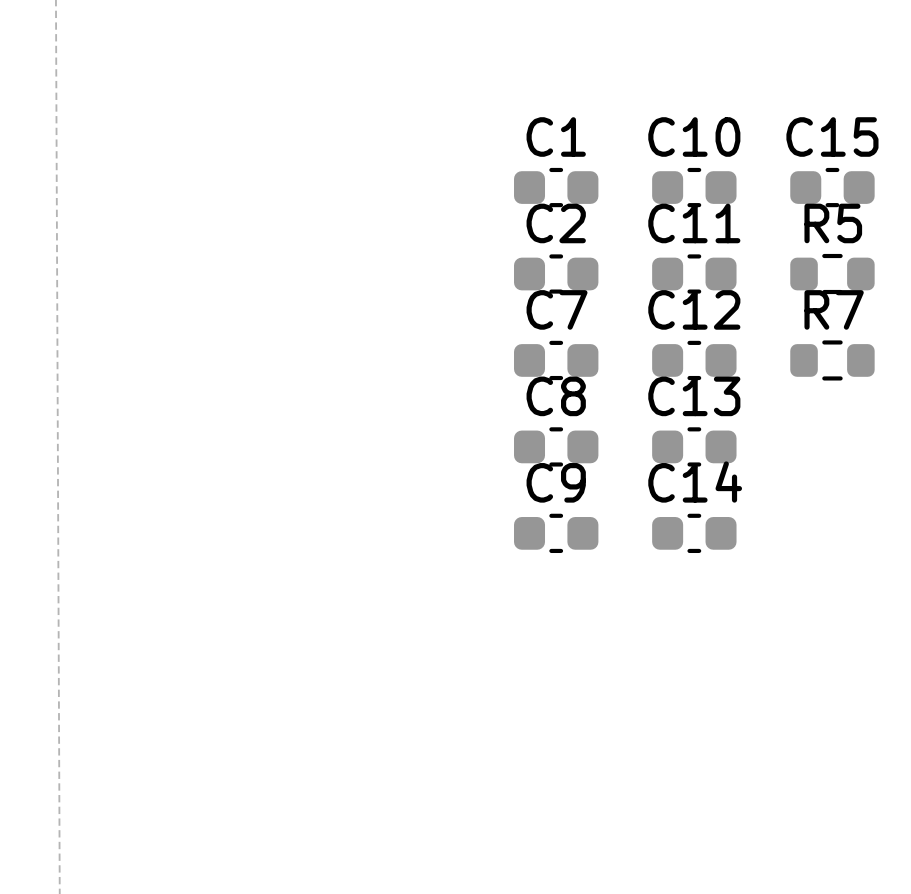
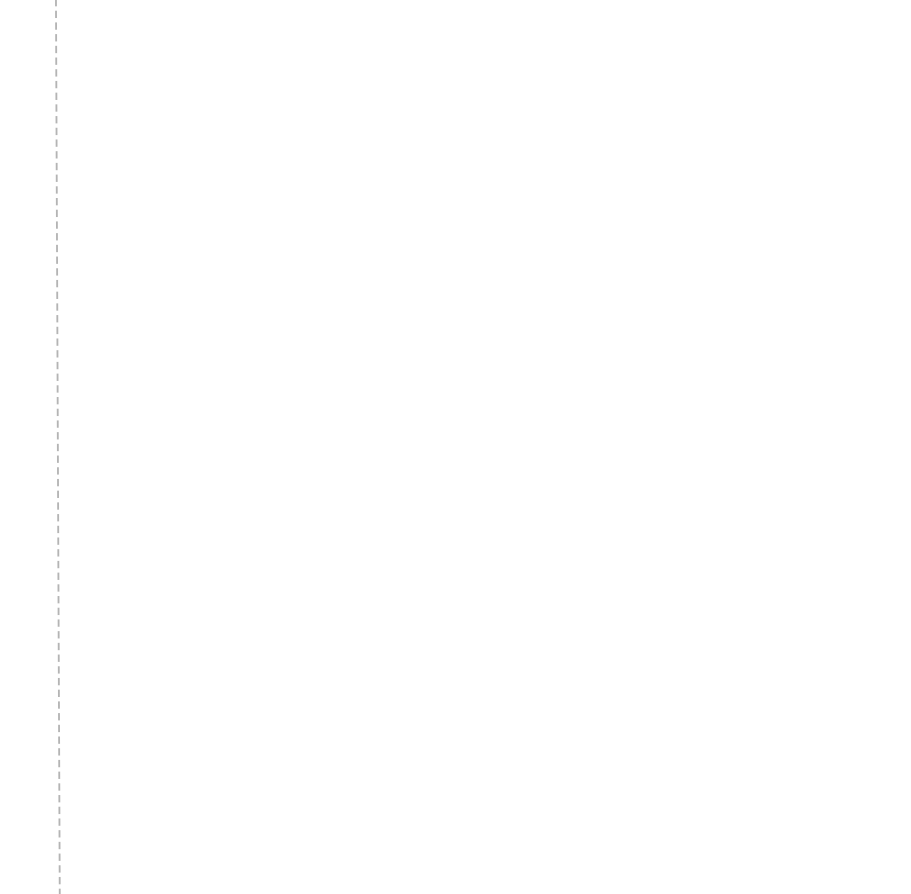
C1: (556, 187) -> none
C10: (694, 187) -> none
C15: (832, 187) -> none
C2: (556, 274) -> none
C11: (694, 274) -> none
R5: (832, 274) -> none
C7: (556, 360) -> none
C12: (694, 360) -> none
R7: (832, 360) -> none
C8: (556, 446) -> none
C13: (694, 446) -> none
C9: (556, 533) -> none
C14: (694, 533) -> none

